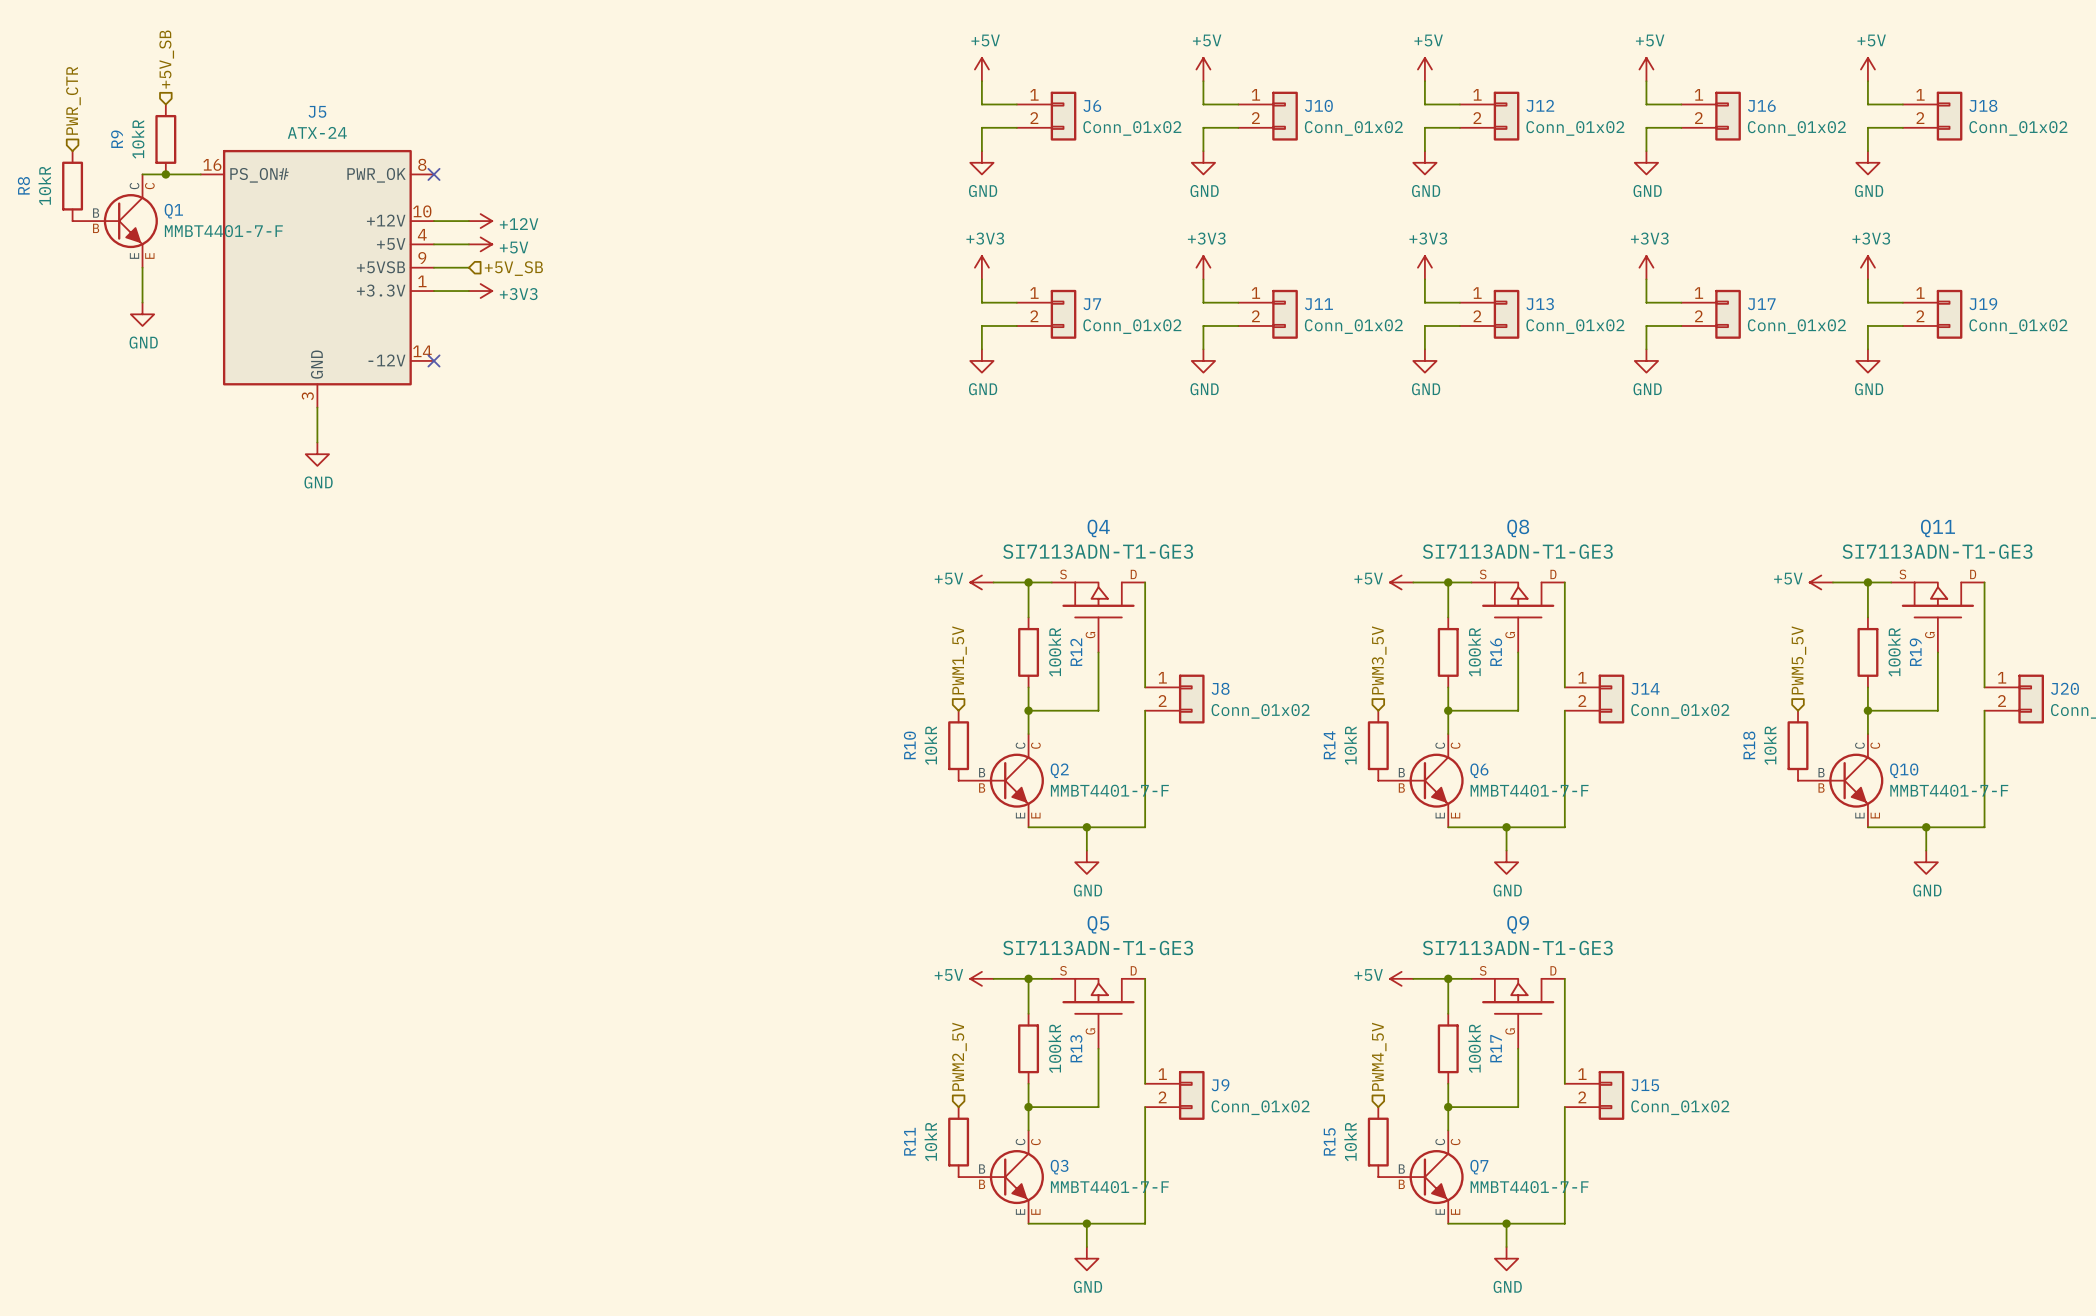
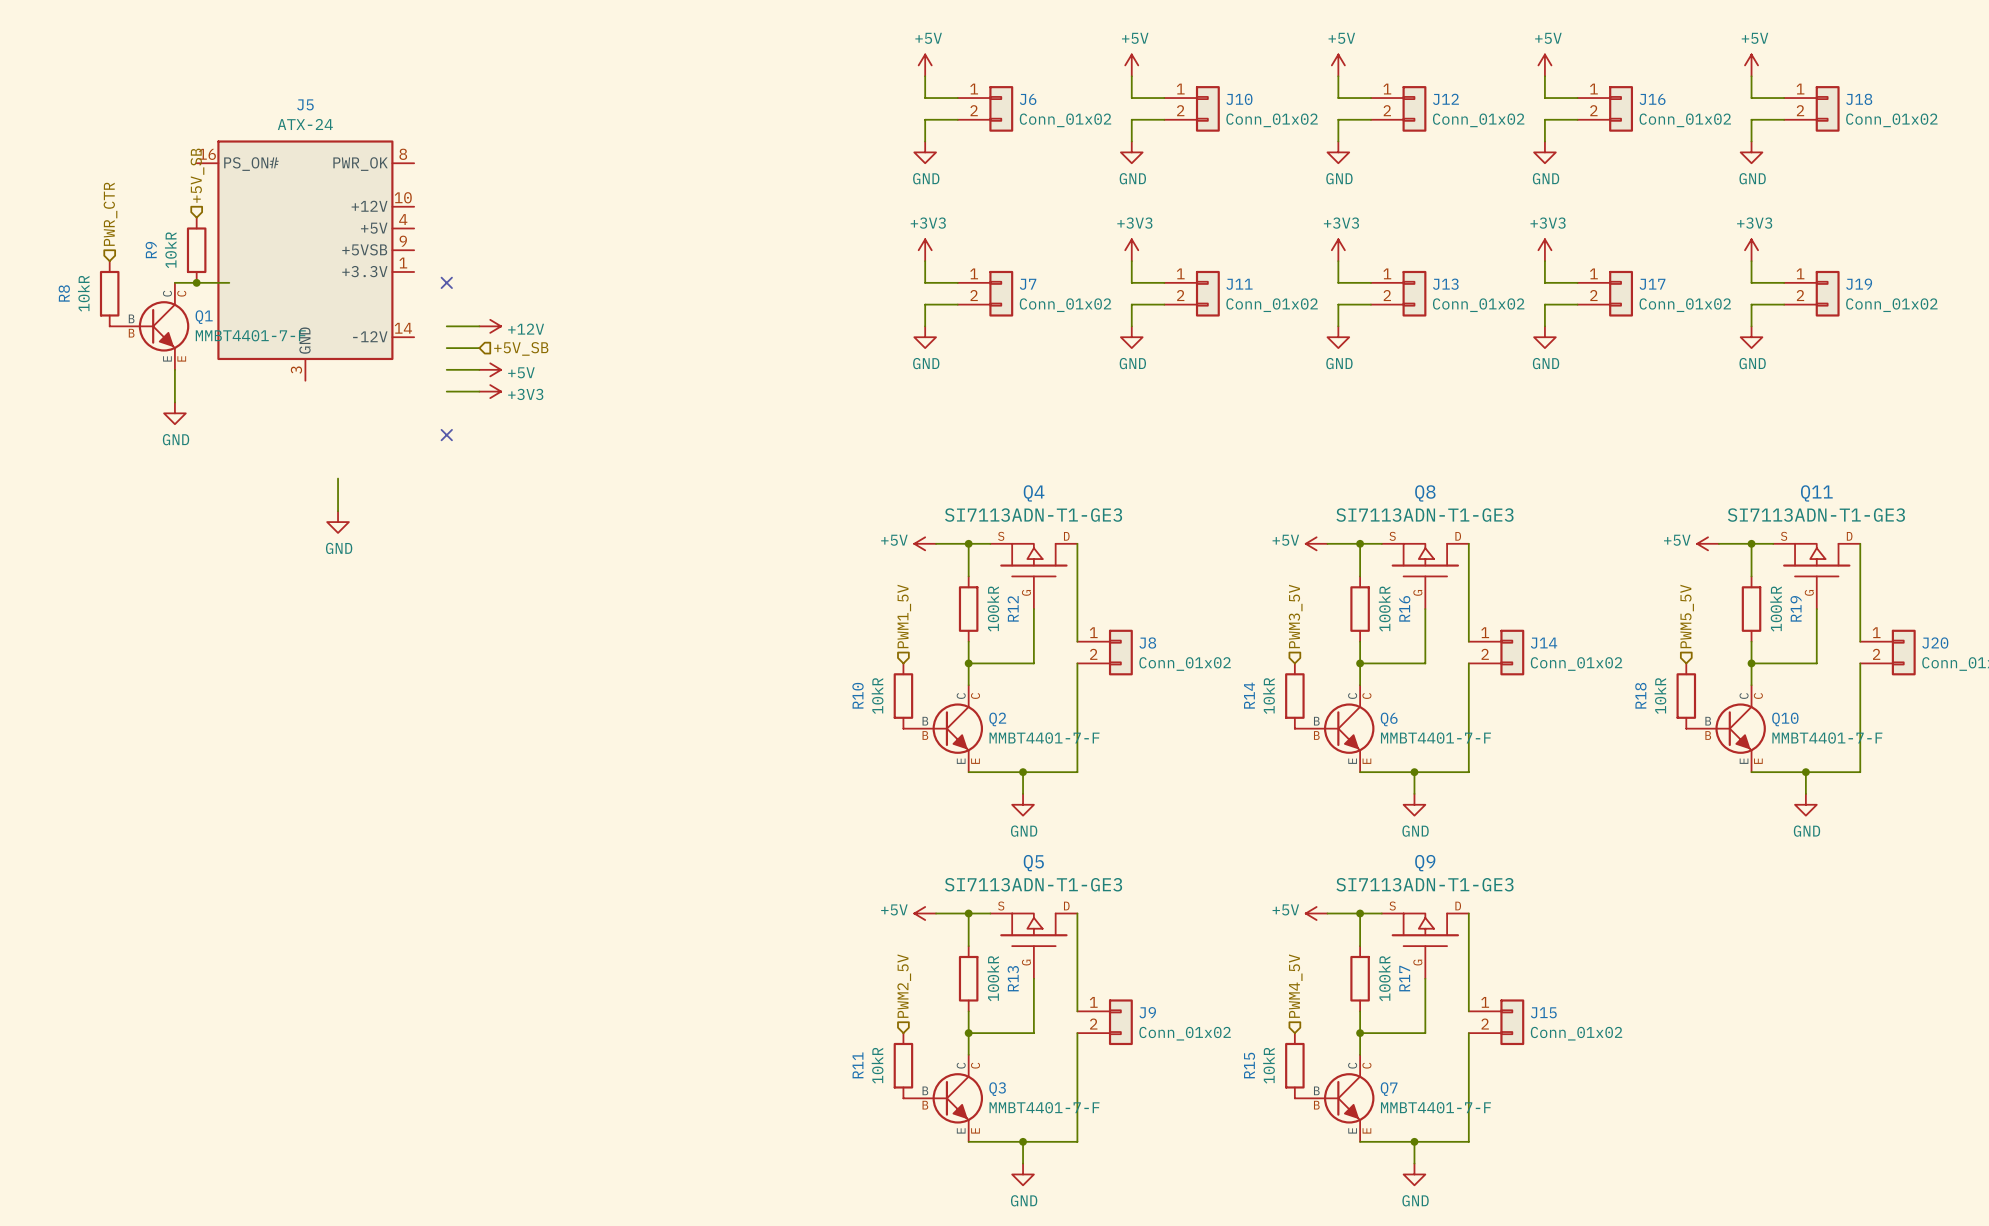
hierarchical label position: +5V_SB (166, 59) -> +5V_SB (197, 175)
hierarchical label position: PWR_CTR (73, 100) -> PWR_CTR (110, 214)
R9 position: (165, 139) -> (196, 250)
wire: (142, 174) (200, 174) -> (174, 282) (229, 282)
junction: (165, 174) -> none
no-connect mark: (433, 174) -> none
R8 position: (72, 186) -> (109, 293)
Q1 position: (115, 221) -> (149, 326)
wire: (433, 221) (468, 221) -> (446, 326) (479, 326)
power symbol position: +12V (480, 221) -> +12V (490, 326)
wire: (433, 244) (468, 244) -> (446, 348) (479, 348)
power symbol position: +5V (480, 244) -> +5V (490, 369)
wire: (142, 267) (142, 302) -> (174, 369) (174, 402)
wire: (433, 267) (468, 267) -> (446, 369) (479, 369)
hierarchical label position: +5V_SB (513, 268) -> +5V_SB (521, 348)
wire: (433, 291) (468, 291) -> (446, 391) (479, 391)
power symbol position: +3V3 (480, 291) -> +3V3 (490, 391)
junction: none -> (196, 282)
no-connect mark: none -> (446, 282)
power symbol: GND (142, 314) -> none
no-connect mark: (433, 360) -> none
wire: (317, 407) (317, 442) -> (338, 478) (338, 511)
power symbol: none -> GND (174, 413)
power symbol: GND (317, 454) -> none
no-connect mark: none -> (446, 435)
power symbol: none -> GND (338, 522)

